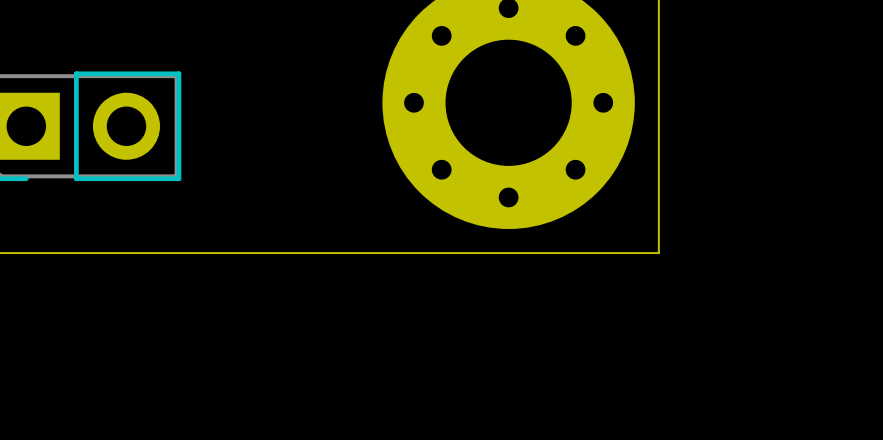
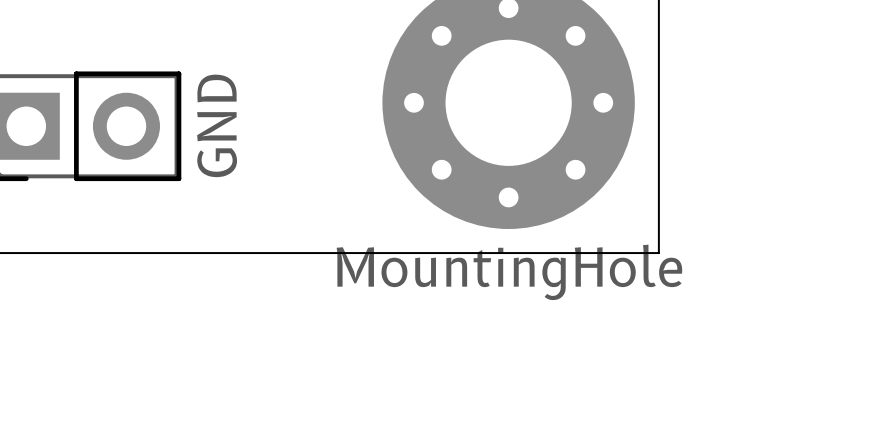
part value: none -> GND (217, 125)
part value: none -> MountingHole (509, 272)

